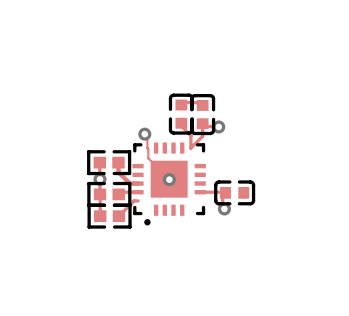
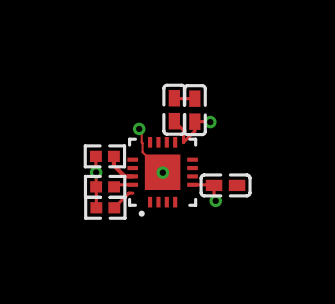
part footprint: [168, 93, 194, 135] -> [162, 83, 187, 136]
part footprint: [190, 94, 216, 136] -> [182, 84, 207, 137]
part footprint: [214, 180, 256, 206] -> [199, 173, 252, 198]

